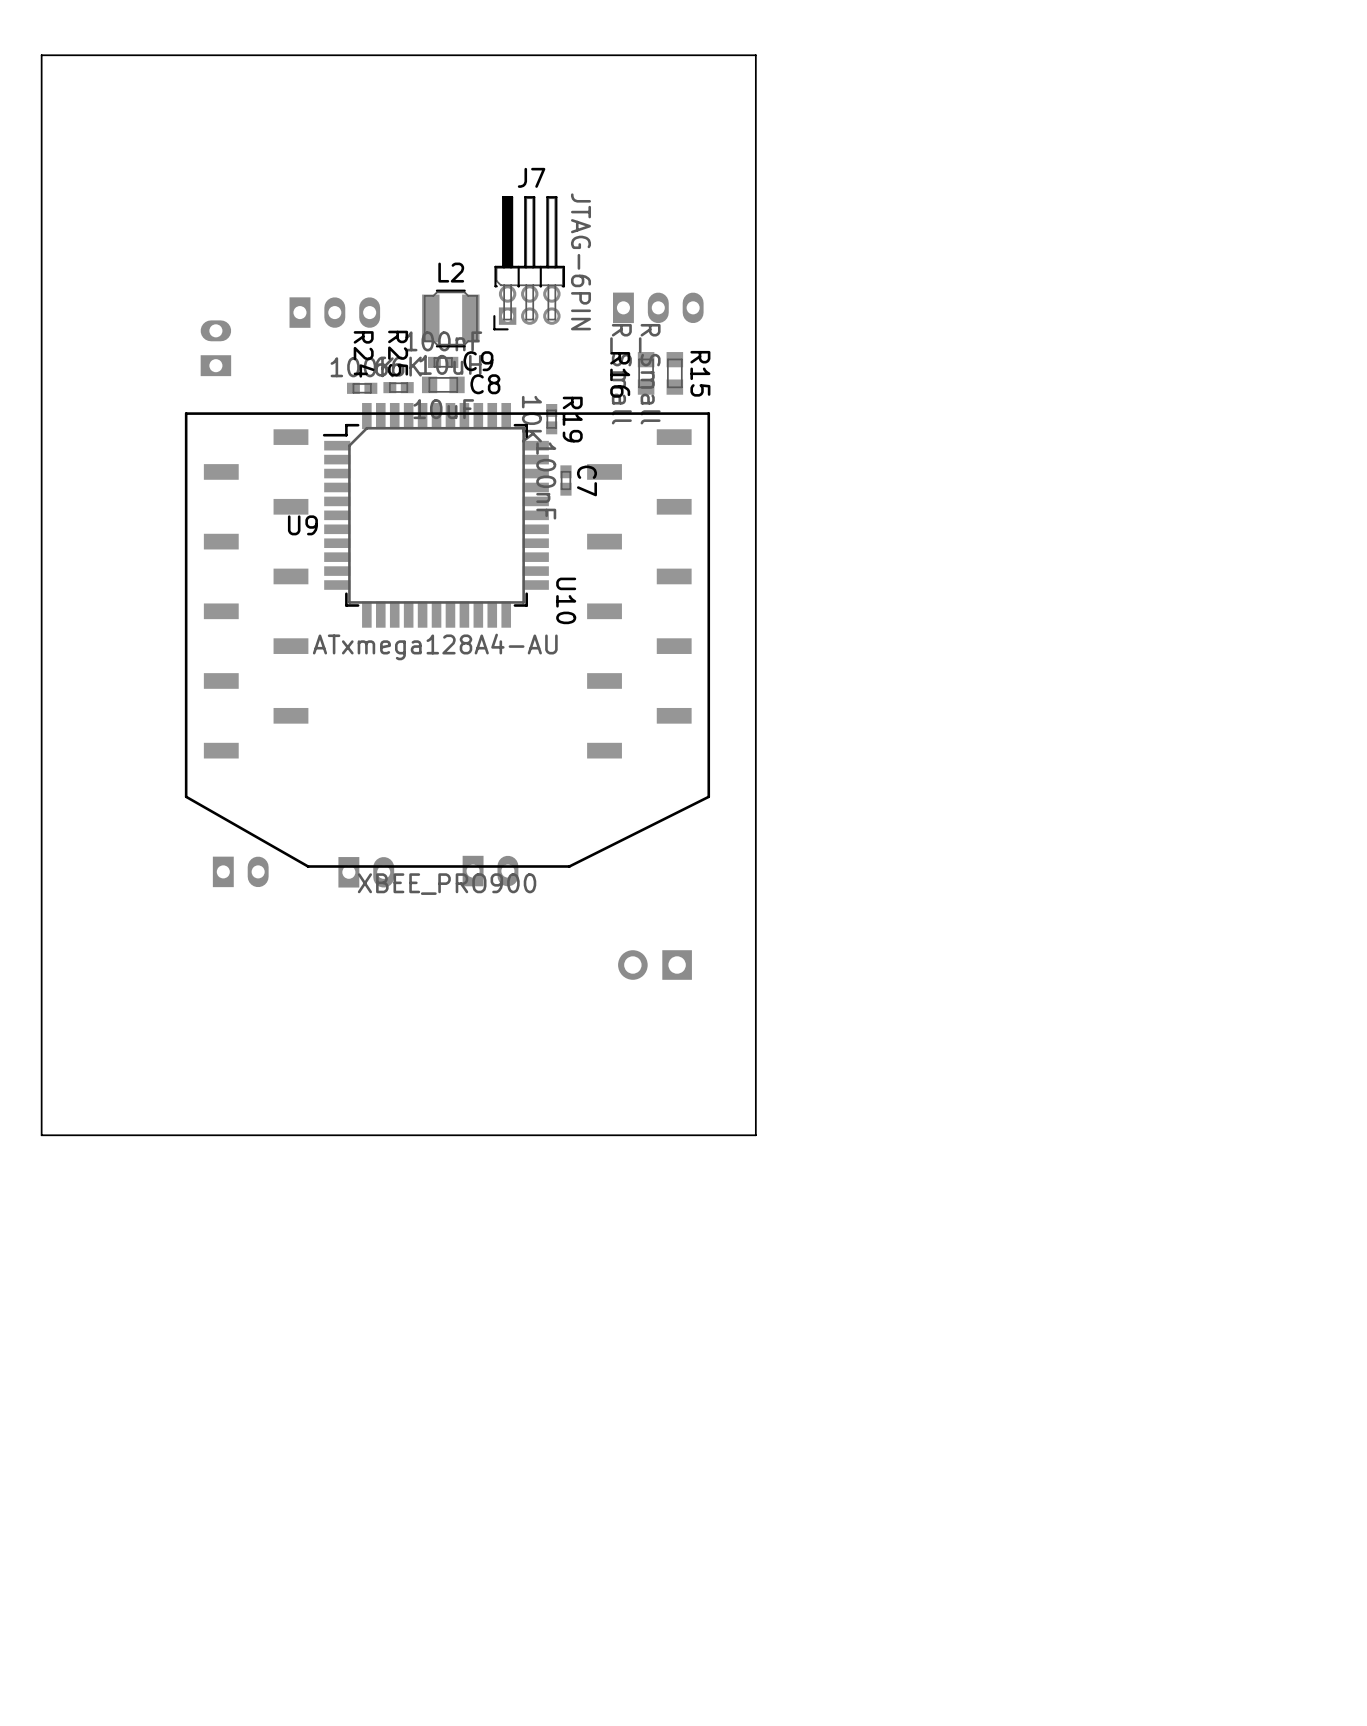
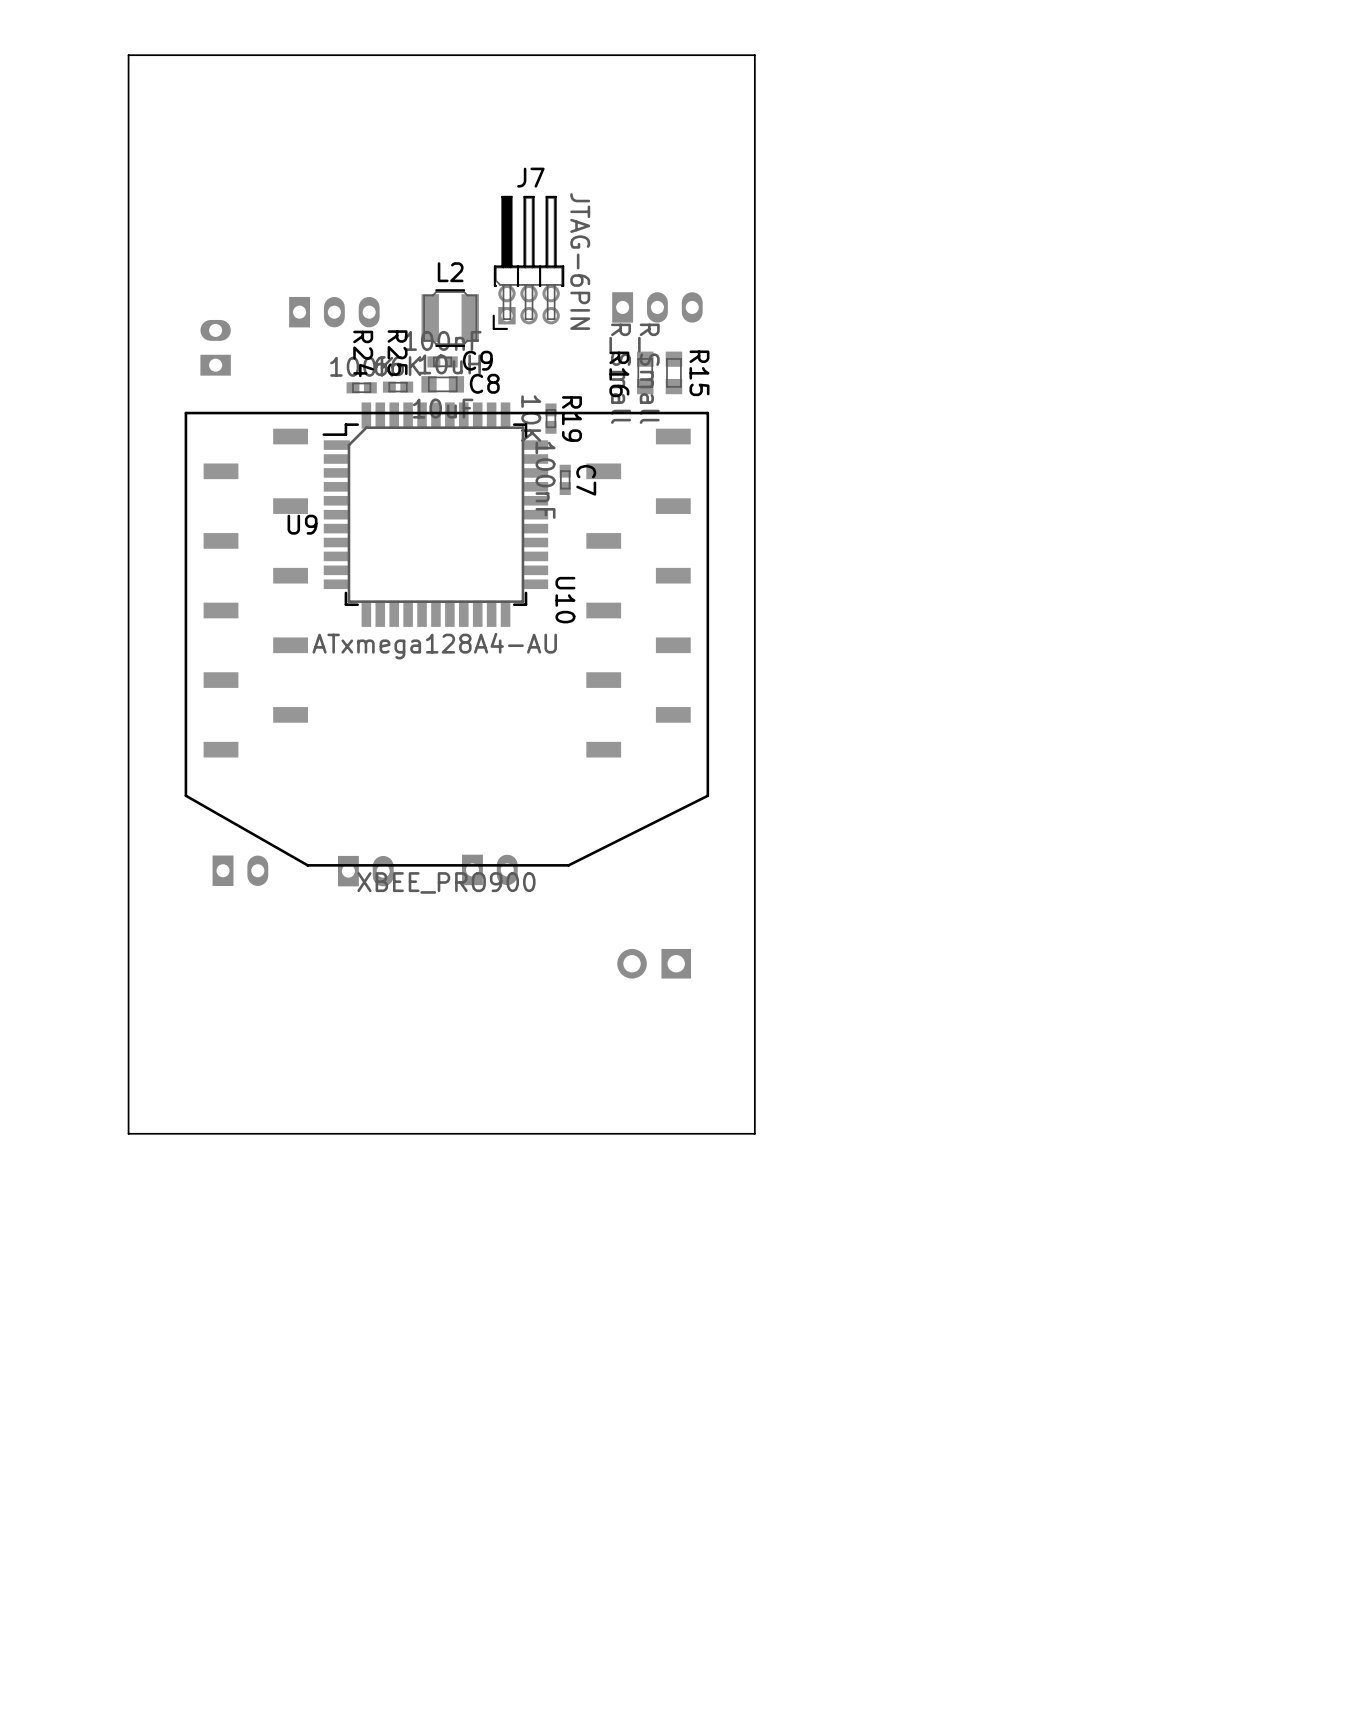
board edge: (128, 55) (41, 55) (41, 1135) (128, 1135) -> (128, 55) (128, 1133)

